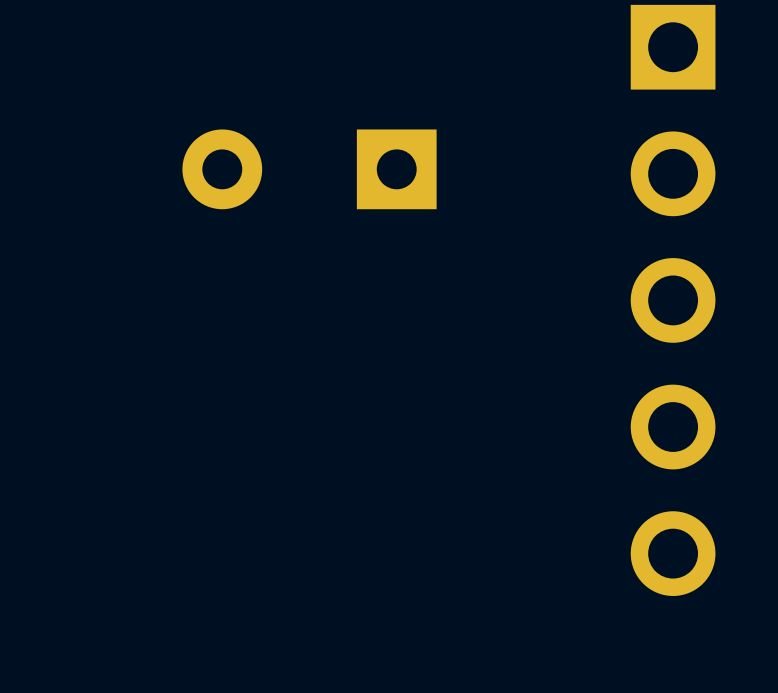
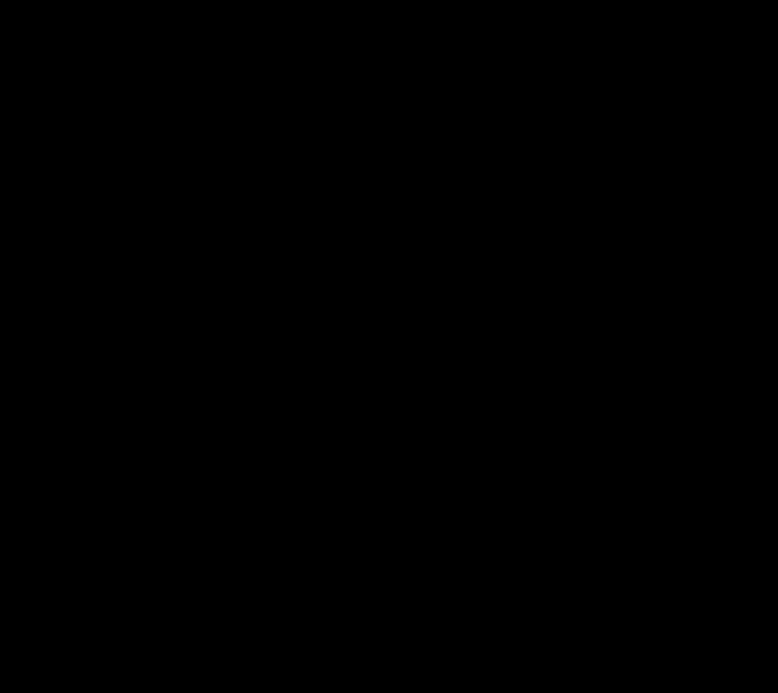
part: (309, 169) -> none
part: (673, 300) -> none

